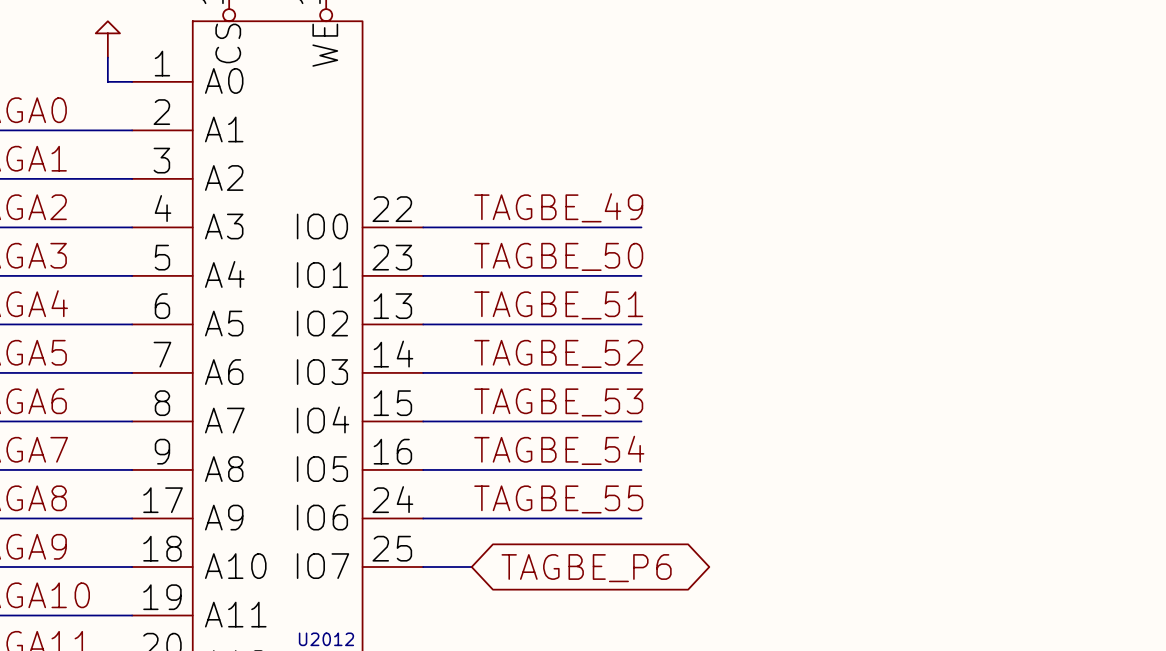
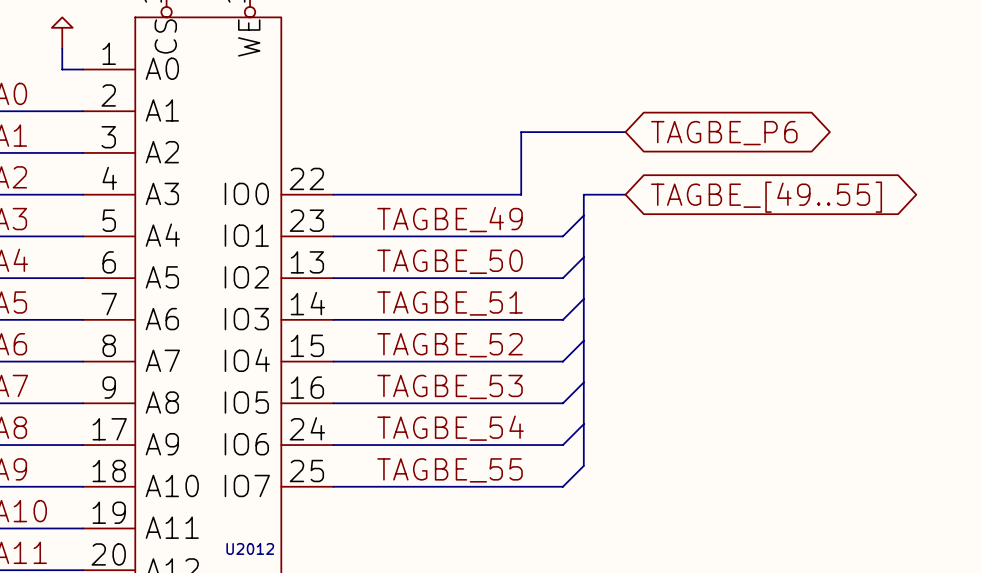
wire: none -> (625, 132) (521, 132) (521, 194)
global label: none -> TAGBE_P6 (724, 133)
label: TAGBE_49 (558, 207) -> none
bus: none -> (625, 194) (583, 194) (583, 465)
global label: none -> TAGBE_[49..55] (766, 197)
wire: none -> (583, 215) (562, 236) (521, 236)
label: TAGBE_50 (558, 256) -> TAGBE_49 (450, 219)
wire: none -> (583, 257) (562, 278) (521, 278)
label: TAGBE_51 (558, 305) -> TAGBE_50 (450, 261)
wire: none -> (583, 299) (562, 319) (521, 319)
label: TAGBE_52 (558, 353) -> TAGBE_51 (450, 303)
wire: none -> (583, 340) (562, 361) (521, 361)
label: TAGBE_53 (558, 402) -> TAGBE_52 (450, 345)
wire: none -> (583, 382) (562, 403) (521, 403)
label: TAGBE_54 (559, 450) -> TAGBE_53 (450, 386)
wire: none -> (583, 424) (562, 445) (521, 445)
label: TAGBE_55 (558, 499) -> TAGBE_54 (450, 428)
wire: none -> (583, 465) (562, 486) (375, 486)
label: none -> TAGBE_55 (450, 470)
global label: TAGBE_P6 (586, 568) -> none

